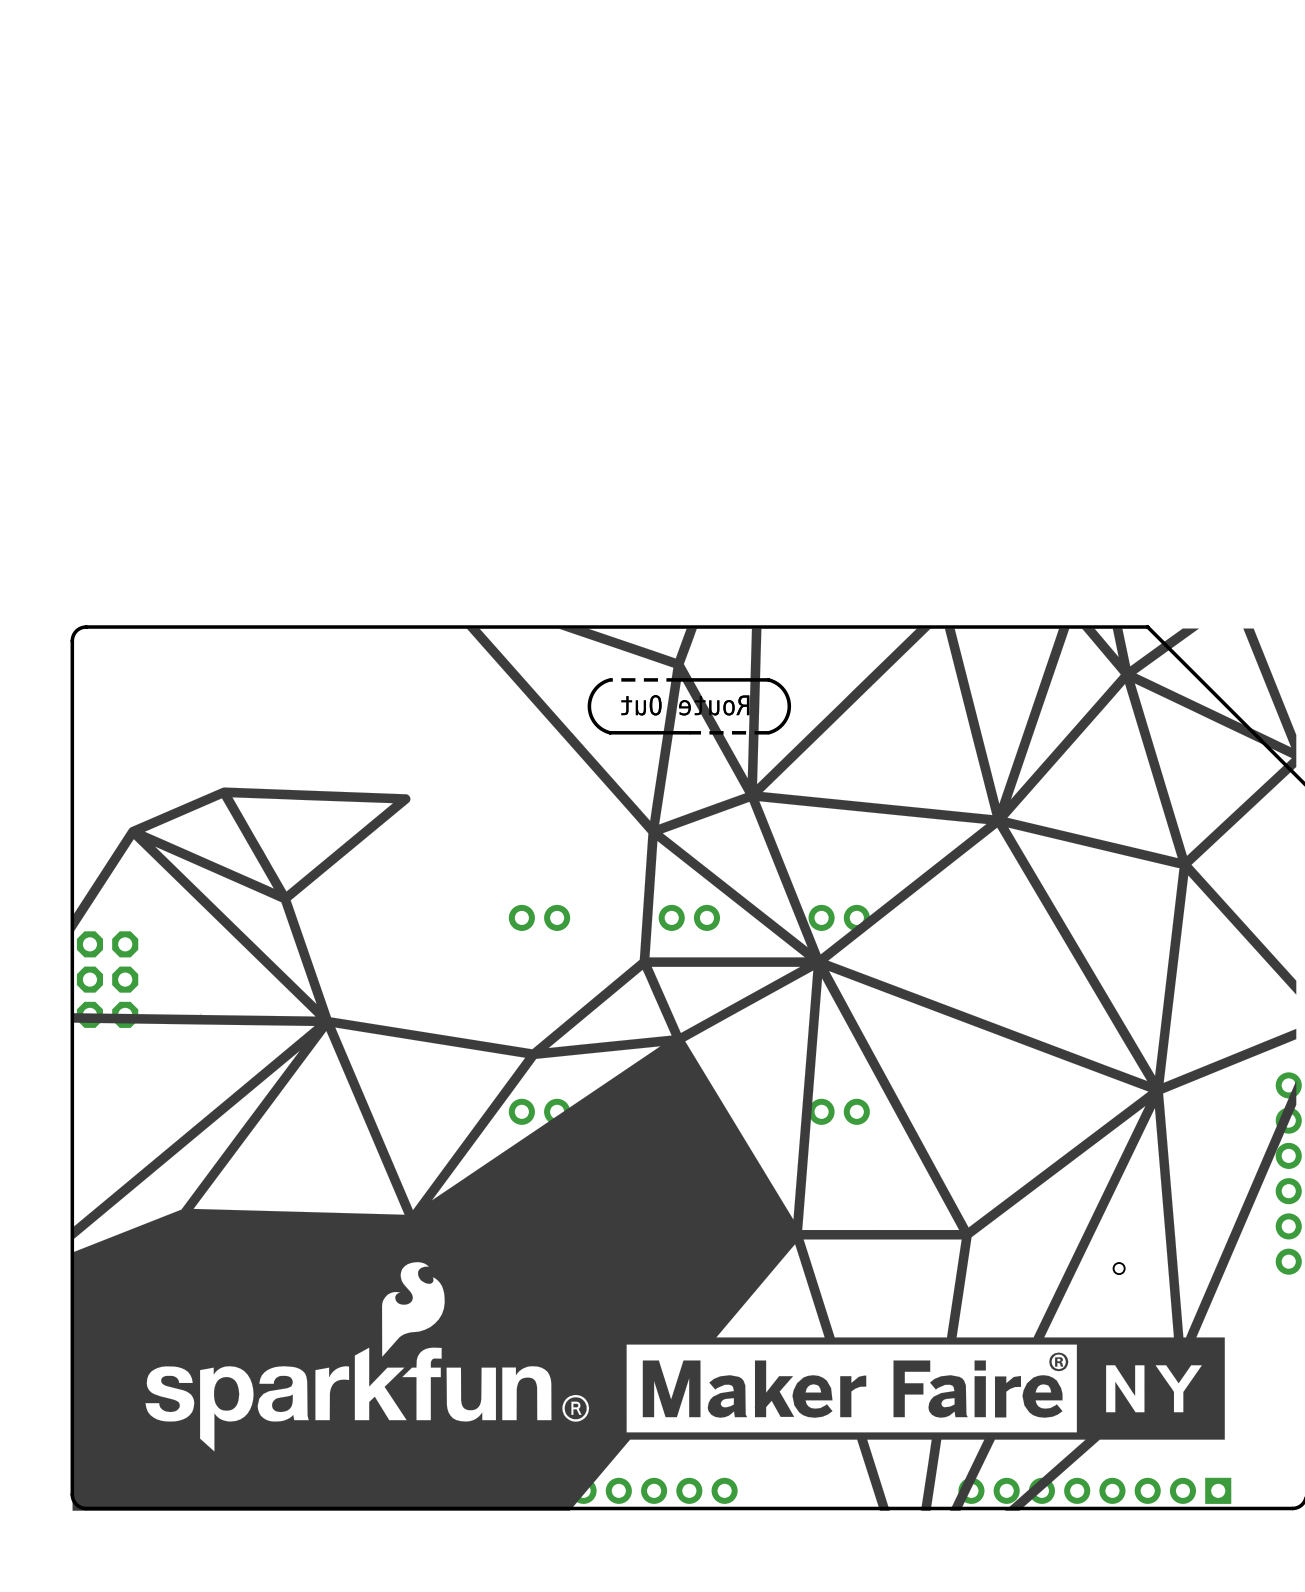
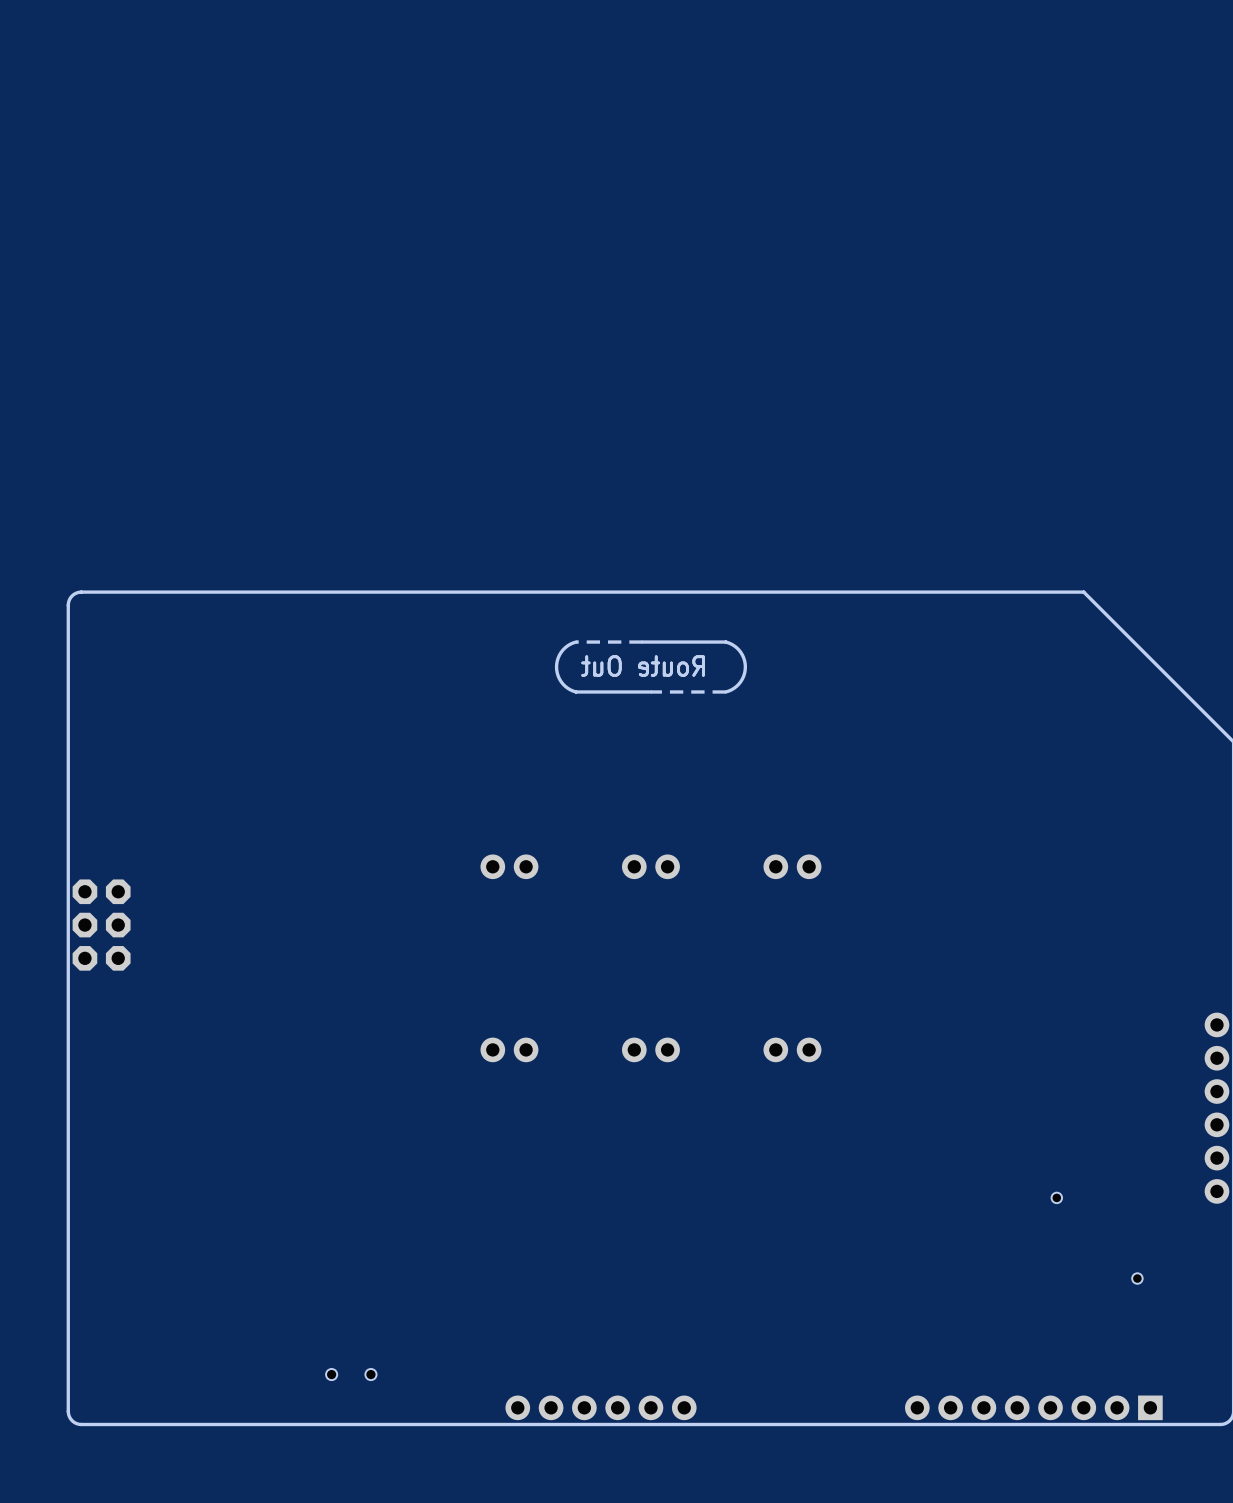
drawing: [72, 628, 1297, 1511] -> none

